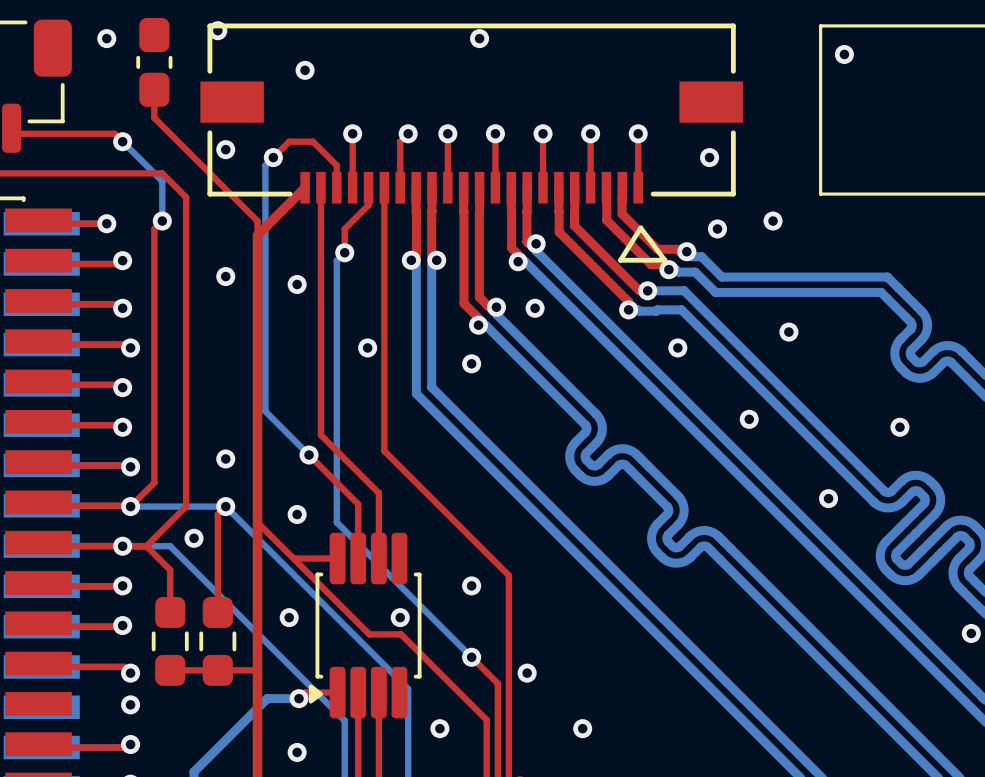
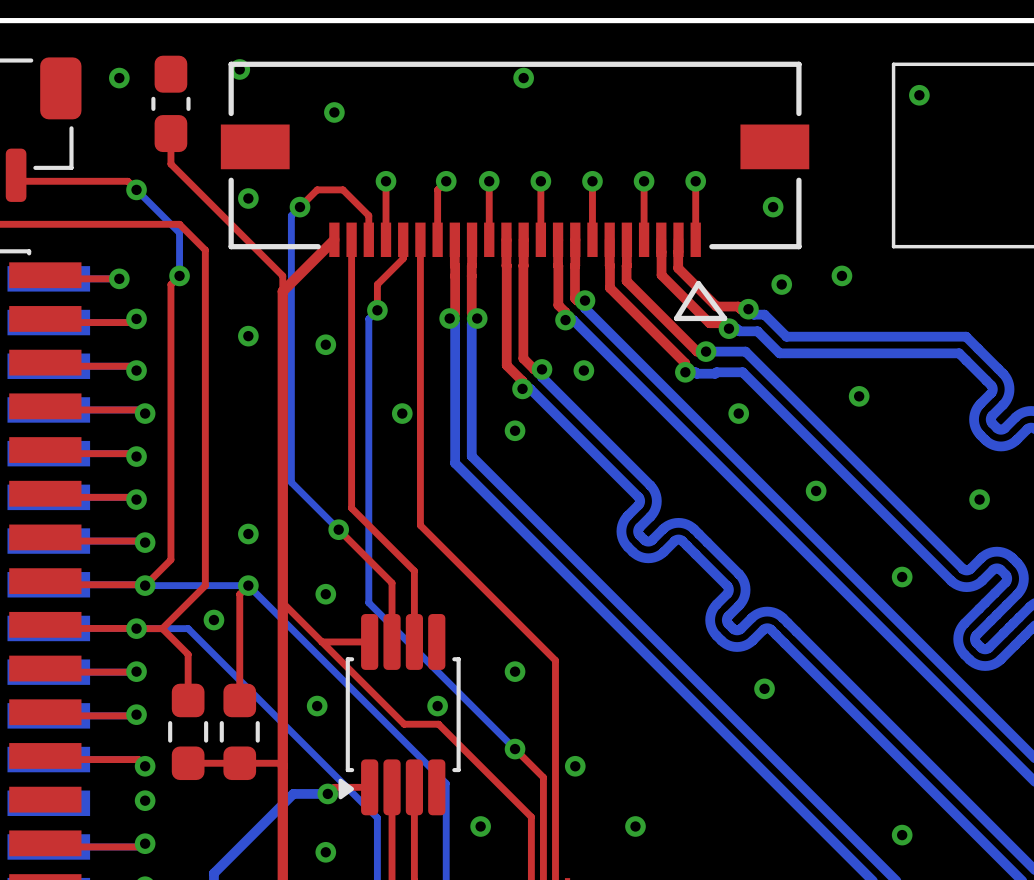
via: none -> (764, 688)
via: none -> (902, 835)

